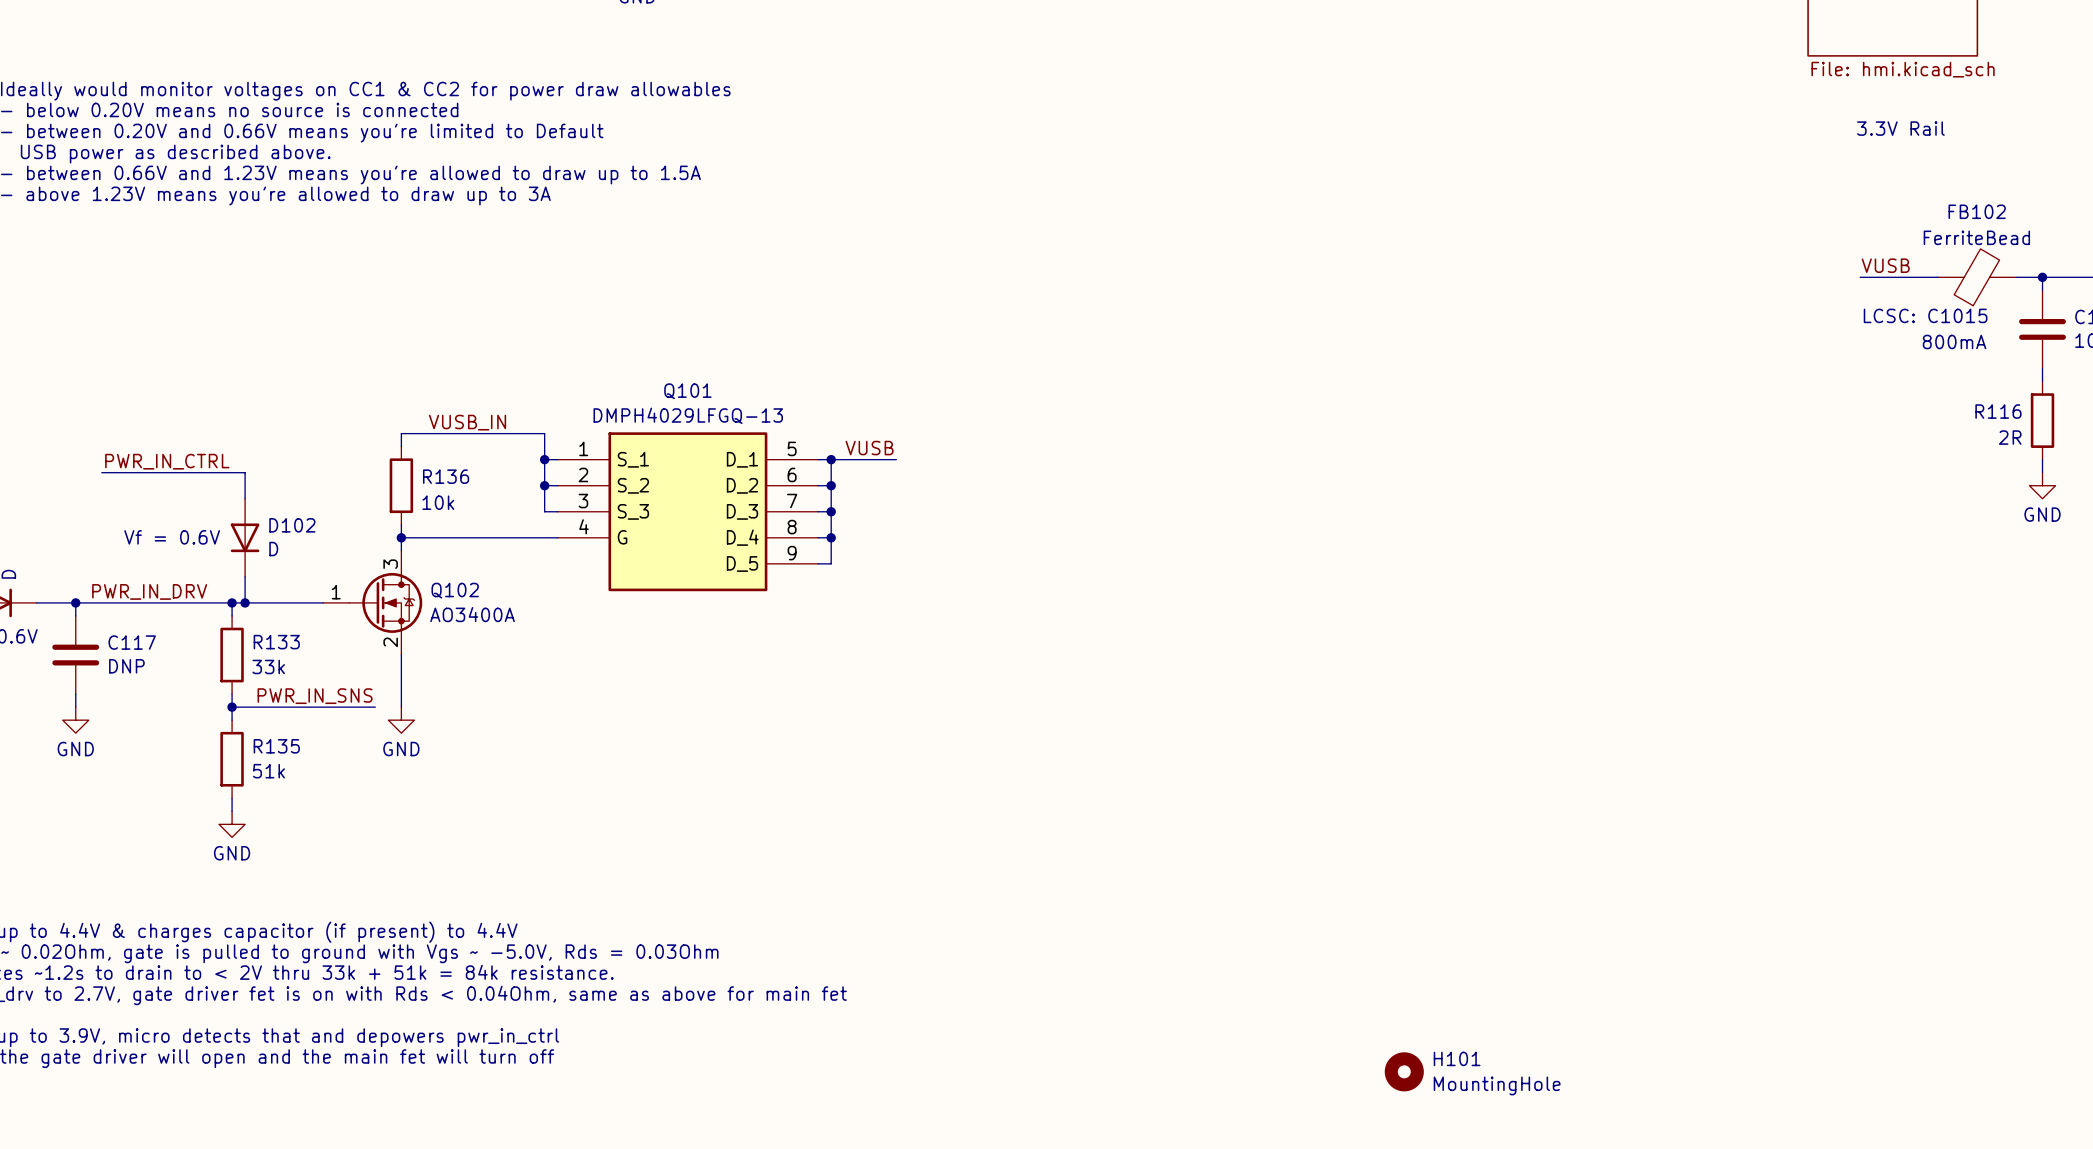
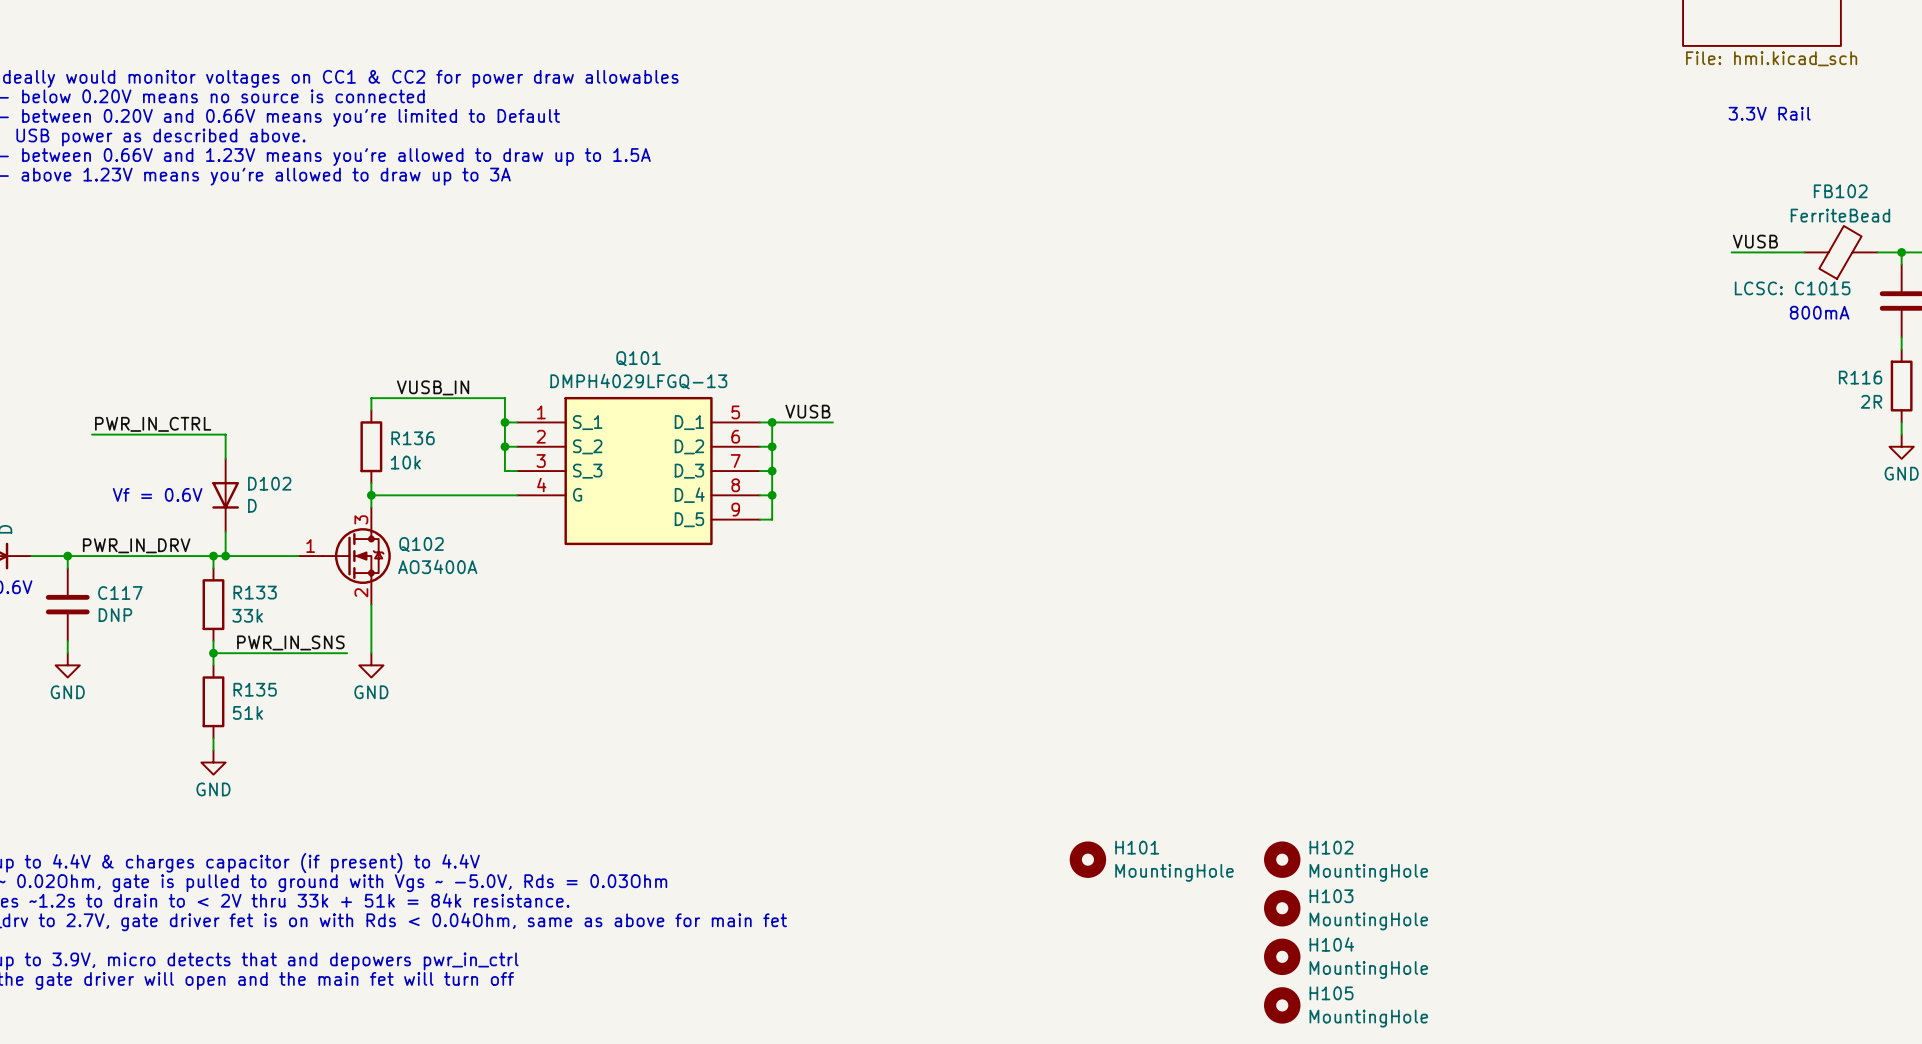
H102: none -> MountingHole (1282, 859)
H103: none -> MountingHole (1282, 908)
H104: none -> MountingHole (1282, 956)
H101 position: (1404, 1071) -> (1087, 859)
H105: none -> MountingHole (1282, 1005)

